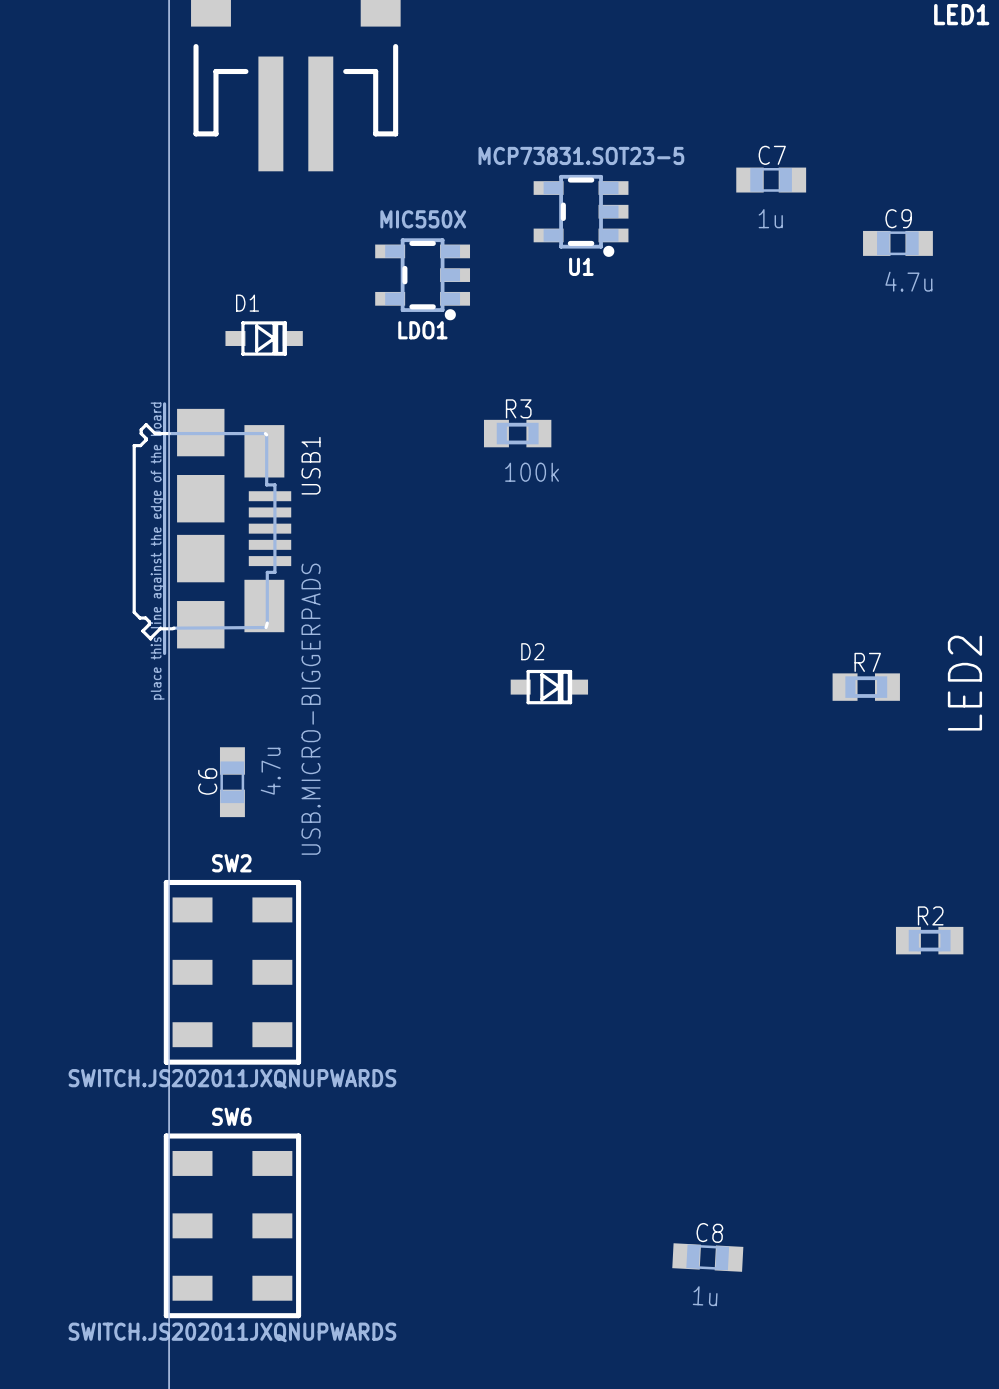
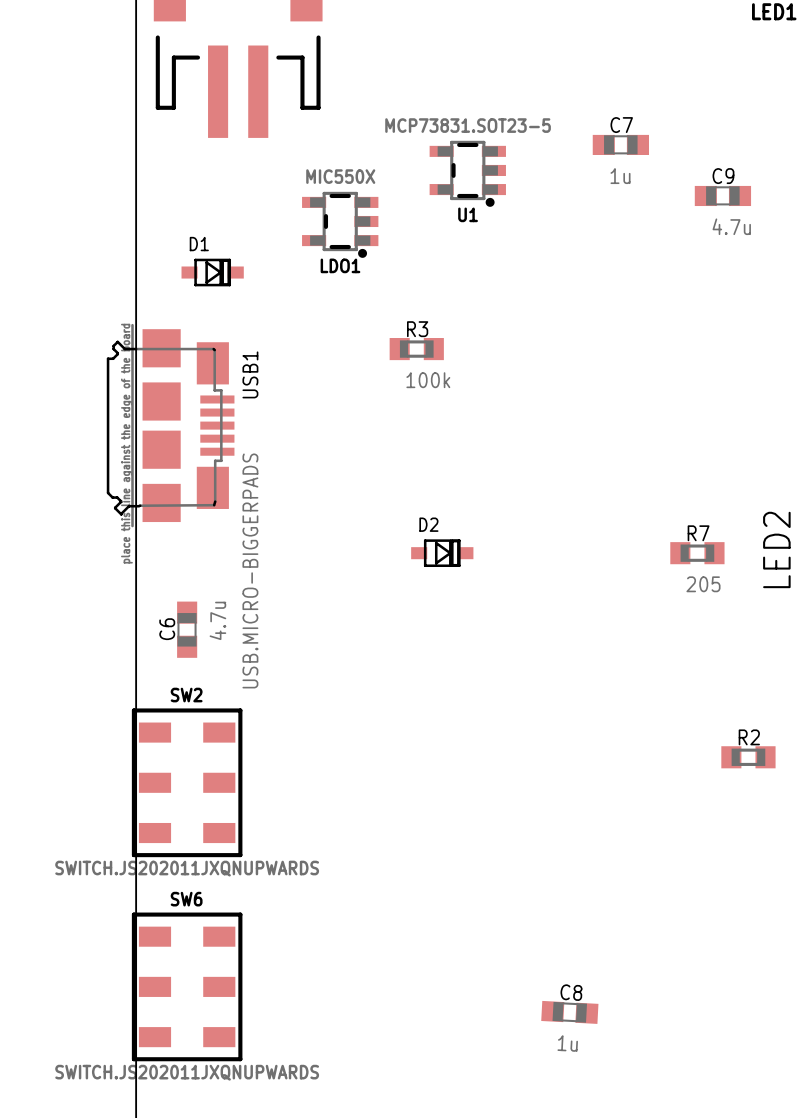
R7 value: none -> 205 (703, 584)

